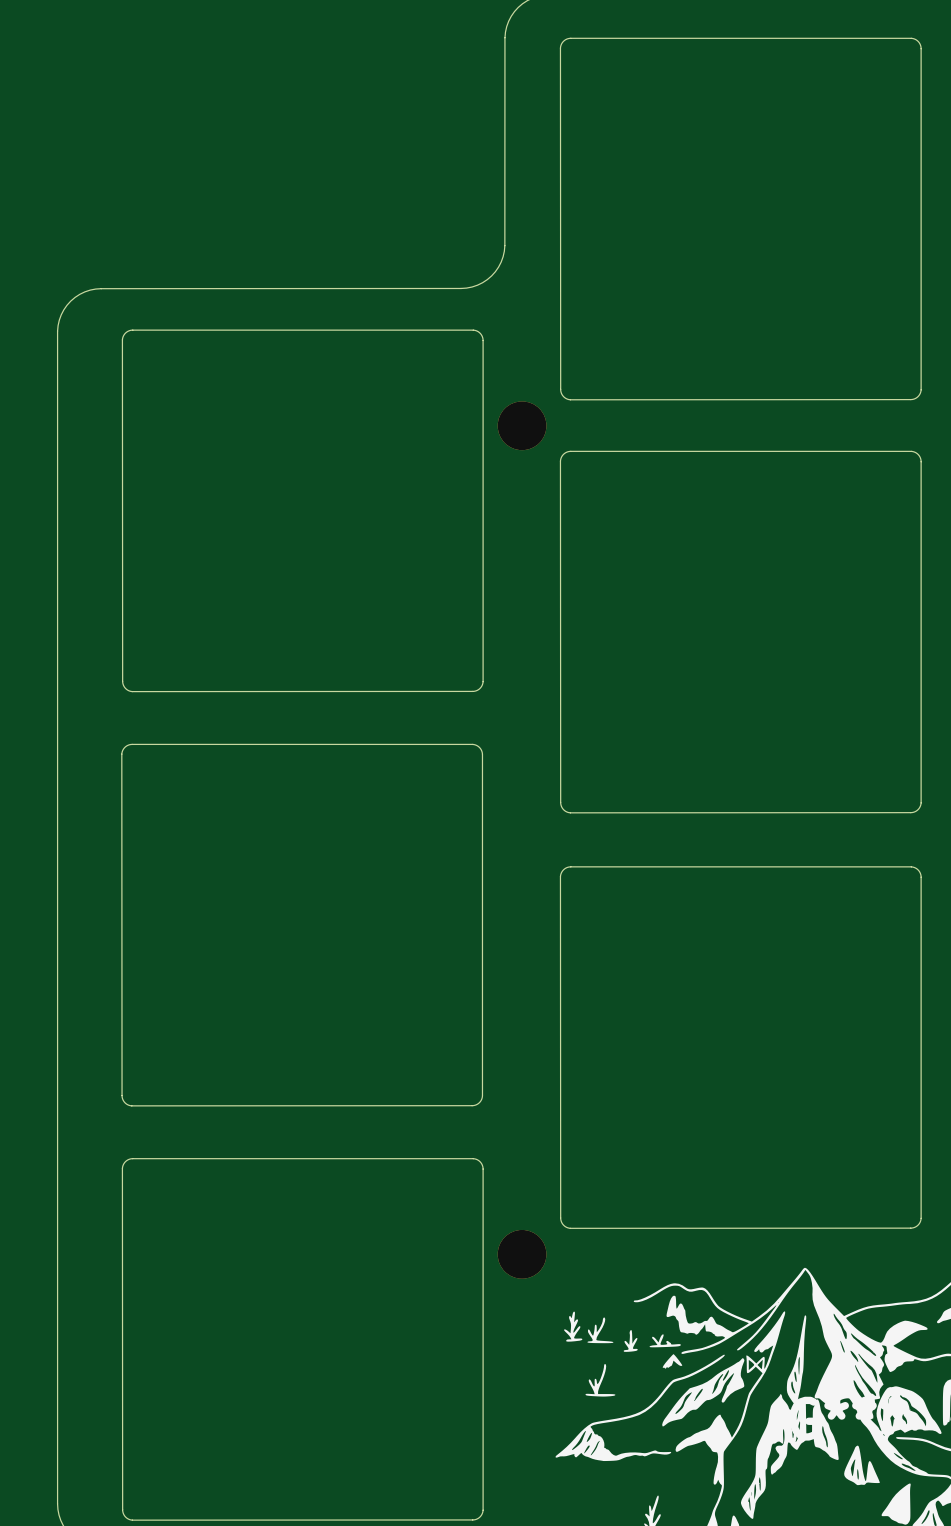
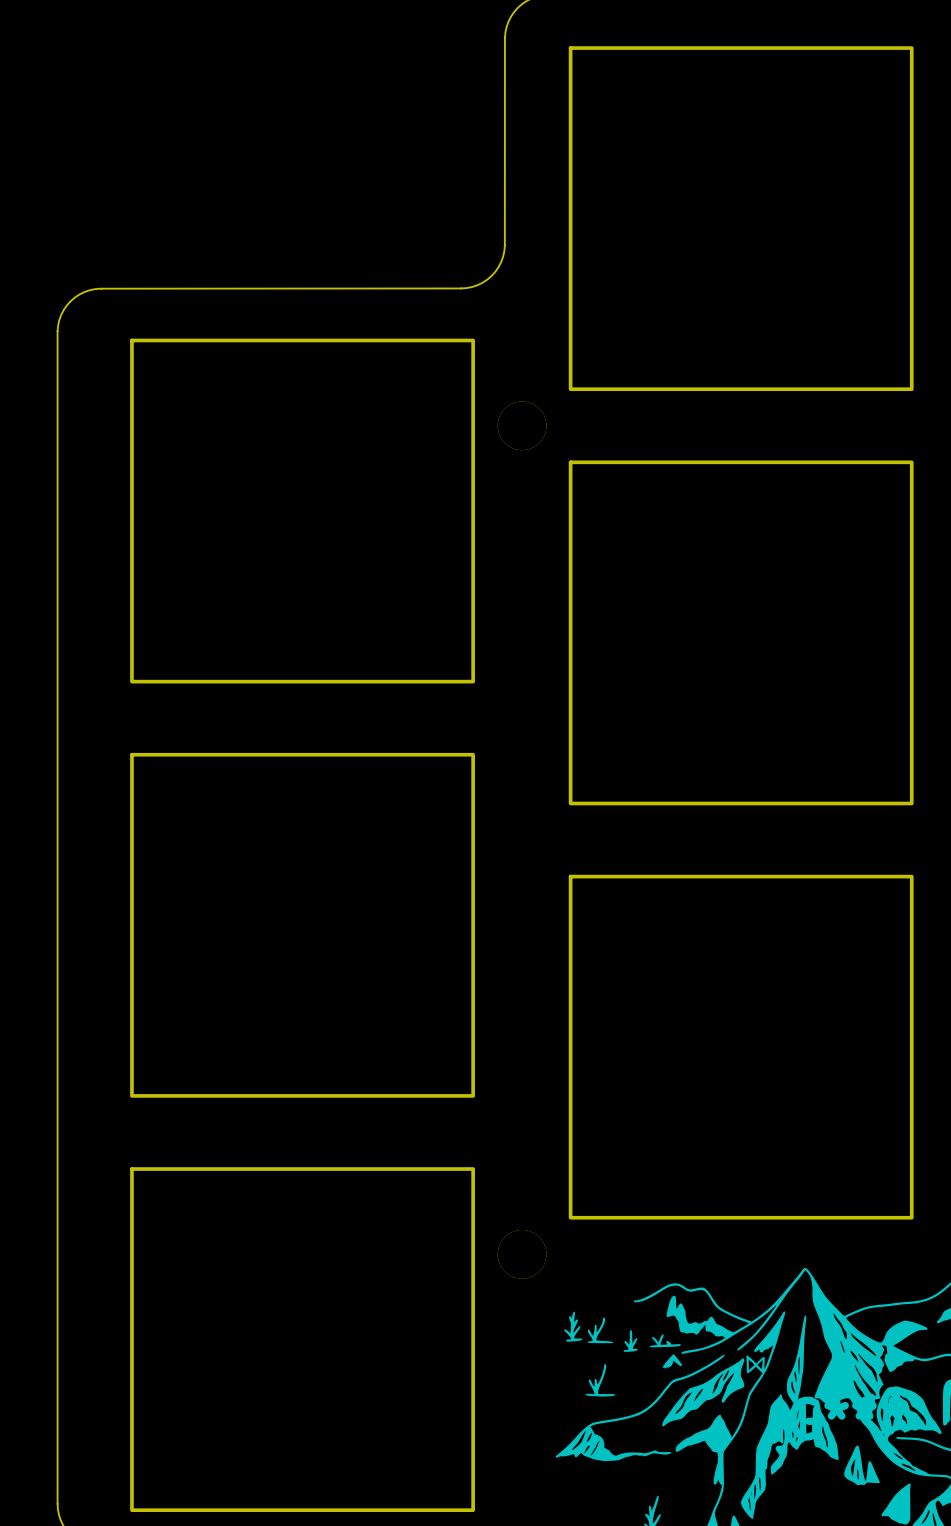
board edge: (570, 38) (911, 38) (918, 41) (921, 48) (921, 389) (917, 396) (910, 399) (570, 399) (563, 396) (560, 389) (560, 48) (563, 41) (570, 38) -> none
drawing: none -> [568, 46, 914, 392]
board edge: (132, 330) (473, 330) (480, 333) (483, 340) (483, 681) (479, 688) (472, 691) (132, 691) (125, 688) (122, 681) (122, 339) (125, 332) (132, 330) -> none
drawing: none -> [130, 338, 475, 684]
board edge: (570, 451) (911, 451) (918, 454) (921, 461) (921, 802) (917, 809) (910, 812) (570, 812) (563, 809) (560, 802) (560, 461) (563, 454) (570, 451) -> none
drawing: none -> [568, 460, 914, 806]
board edge: (132, 744) (472, 744) (479, 747) (482, 754) (482, 1095) (479, 1102) (472, 1105) (131, 1105) (124, 1102) (122, 1095) (121, 754) (125, 747) (132, 744) -> none
drawing: none -> [130, 752, 475, 1098]
board edge: (570, 866) (911, 866) (918, 870) (921, 877) (921, 1218) (917, 1225) (910, 1228) (570, 1228) (563, 1225) (560, 1217) (560, 876) (563, 869) (570, 866) -> none
drawing: none -> [568, 874, 914, 1220]
board edge: (132, 1158) (473, 1158) (480, 1161) (483, 1169) (483, 1510) (479, 1517) (472, 1519) (132, 1520) (125, 1516) (122, 1509) (122, 1168) (125, 1161) (132, 1158) -> none
drawing: none -> [130, 1167, 475, 1513]

